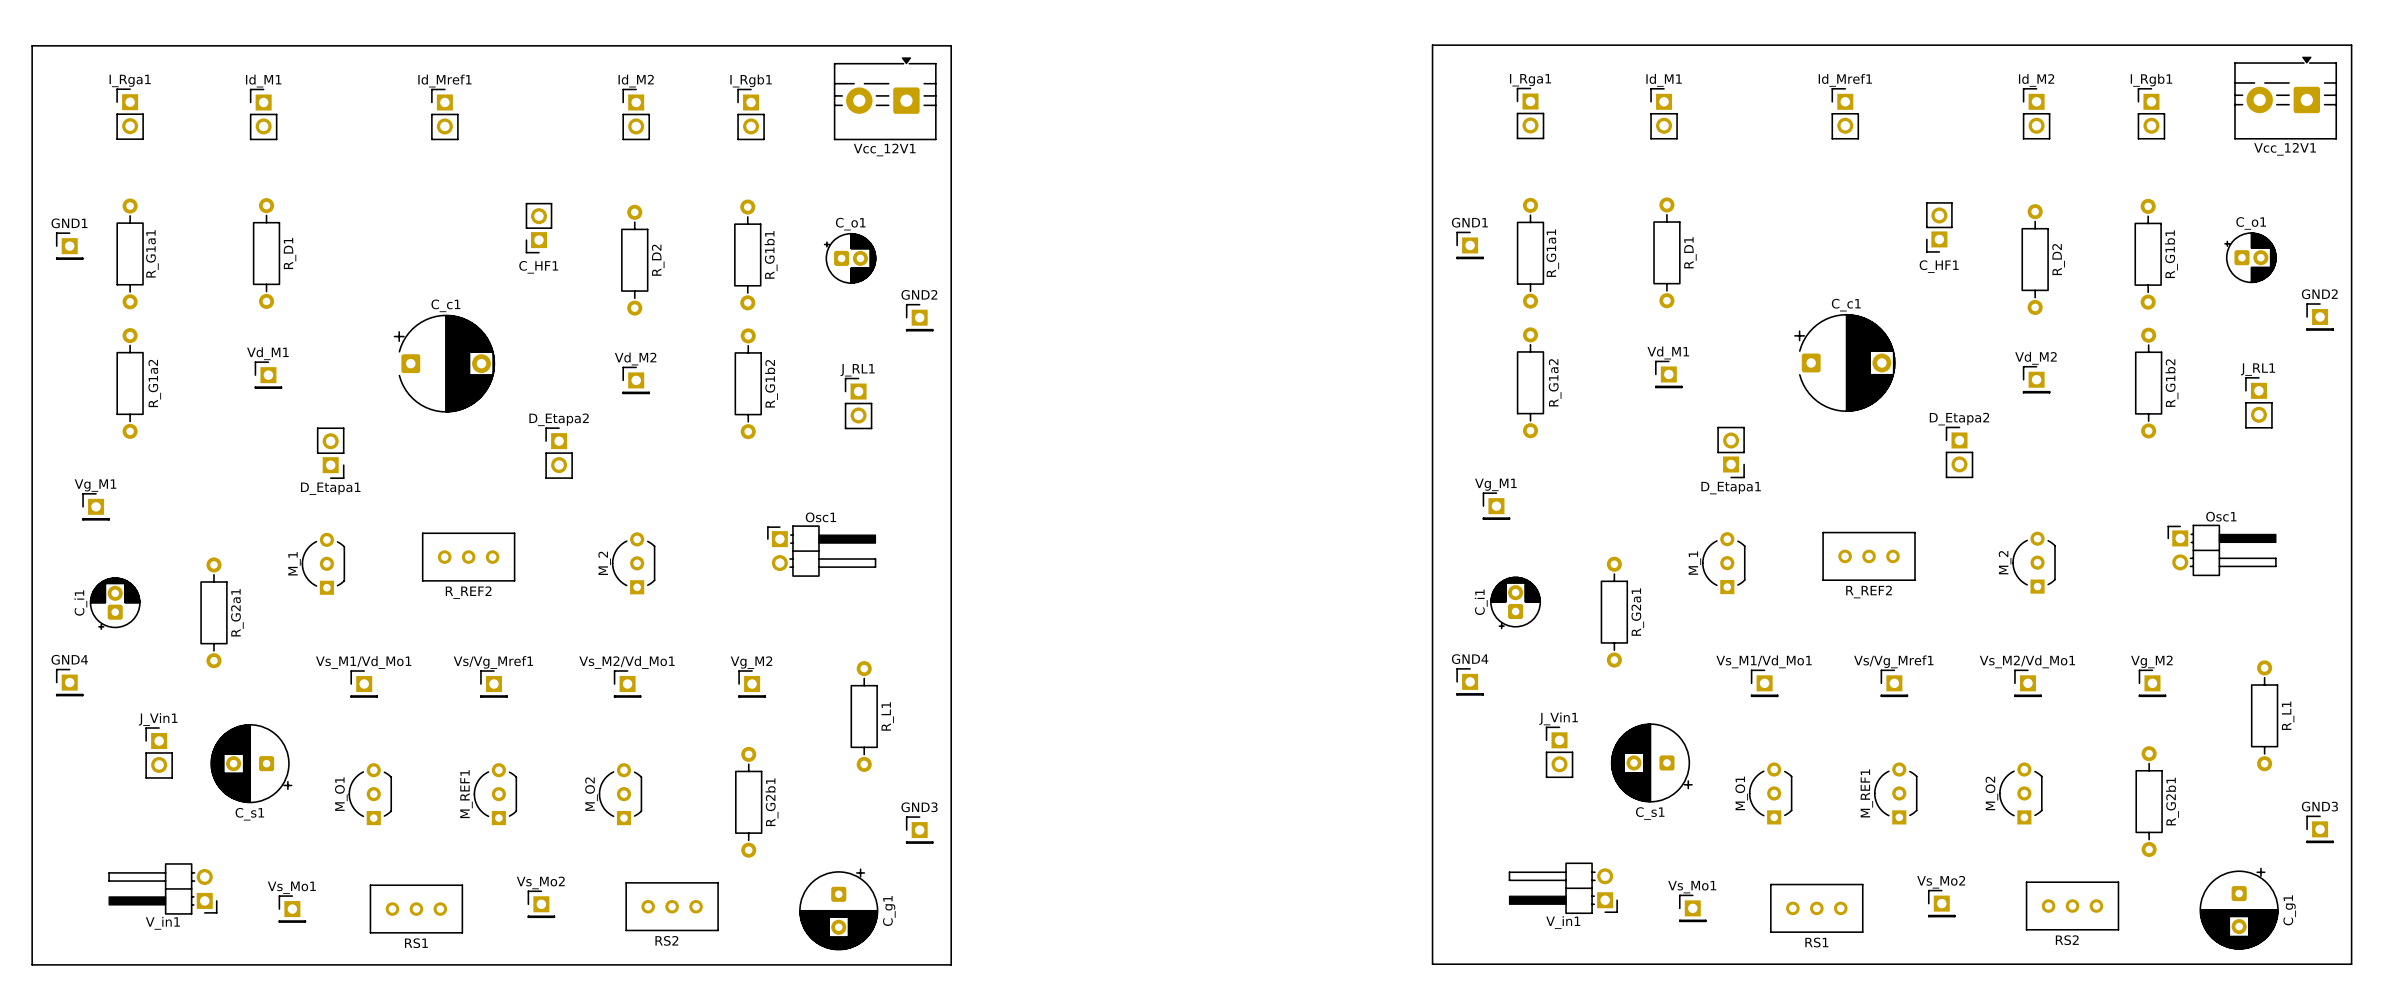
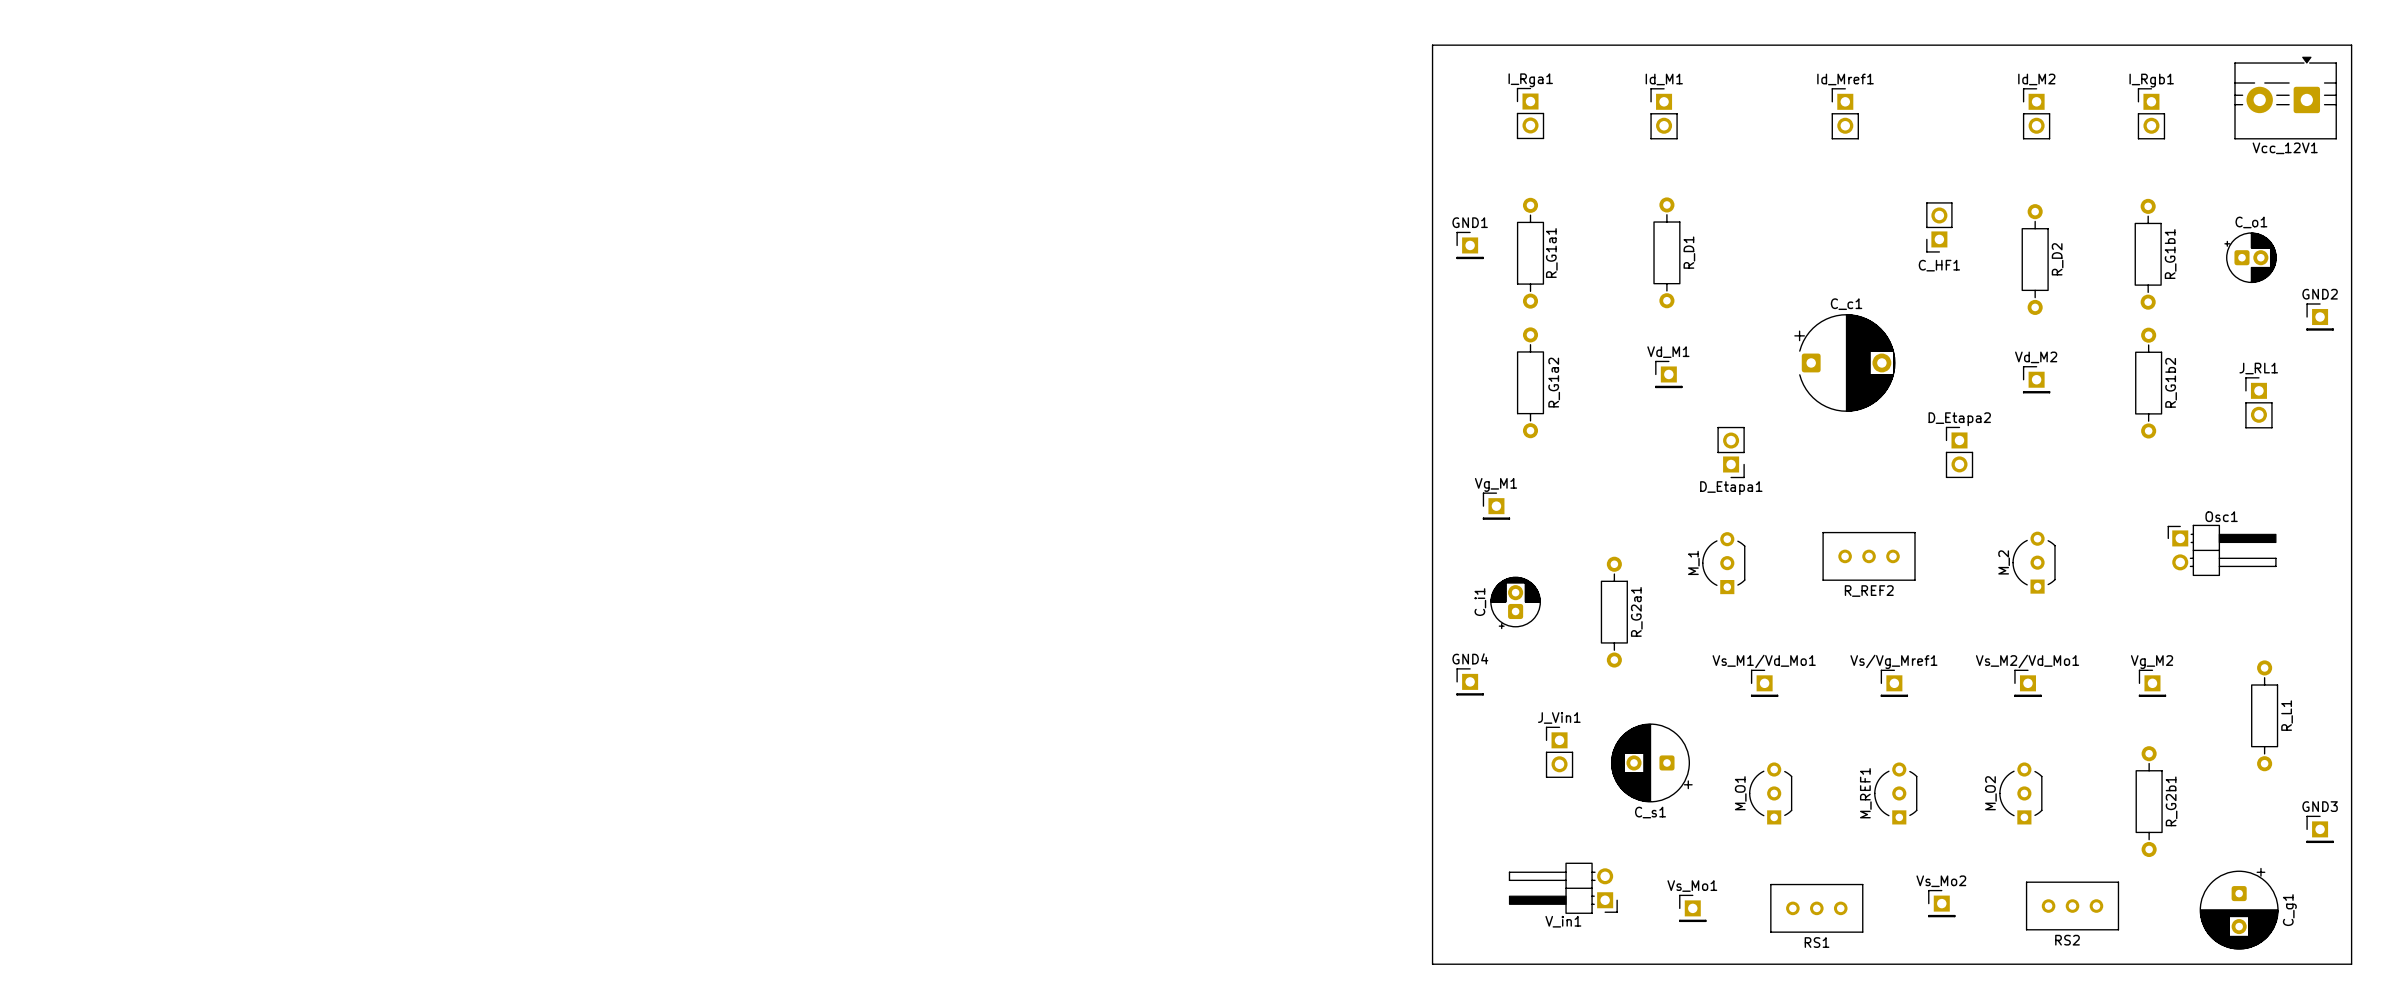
board edge: (32, 45) (951, 45) (951, 964) (32, 964) (32, 45) -> none
Vcc_12V1: (885, 98) -> none
I_Rga1: (130, 114) -> none
Id_M1: (263, 114) -> none
Id_Mref1: (444, 114) -> none
Id_M2: (636, 114) -> none
I_Rgb1: (751, 114) -> none
C_HF1: (538, 228) -> none
GND1: (69, 246) -> none
R_G1a1: (130, 253) -> none
R_D1: (266, 253) -> none
R_G1b1: (747, 254) -> none
C_o1: (850, 258) -> none
R_D2: (634, 260) -> none
GND2: (919, 317) -> none
C_c1: (444, 363) -> none
Vd_M1: (268, 375) -> none
Vd_M2: (636, 380) -> none
R_G1a2: (130, 383) -> none
R_G1b2: (748, 383) -> none
J_RL1: (858, 403) -> none
D_Etapa1: (330, 453) -> none
D_Etapa2: (559, 453) -> none
Vg_M1: (96, 506) -> none
Osc1: (821, 551) -> none
R_REF2: (468, 557) -> none
M_1: (323, 563) -> none
M_2: (633, 563) -> none
C_i1: (115, 603) -> none
R_G2a1: (213, 612) -> none
GND4: (69, 682) -> none
Vs_M1/Vd_Mo1: (364, 684) -> none
Vs/Vg_Mref1: (493, 684) -> none
Vs_M2/Vd_Mo1: (627, 684) -> none
Vg_M2: (752, 684) -> none
R_L1: (864, 716) -> none
J_Vin1: (159, 752) -> none
C_s1: (251, 763) -> none
M_O1: (370, 794) -> none
M_REF1: (495, 794) -> none
M_O2: (620, 794) -> none
R_G2b1: (748, 802) -> none
GND3: (919, 830) -> none
V_in1: (162, 888) -> none
Vs_Mo2: (541, 904) -> none
RS2: (672, 906) -> none
Vs_Mo1: (292, 909) -> none
RS1: (416, 909) -> none
C_g1: (838, 909) -> none

